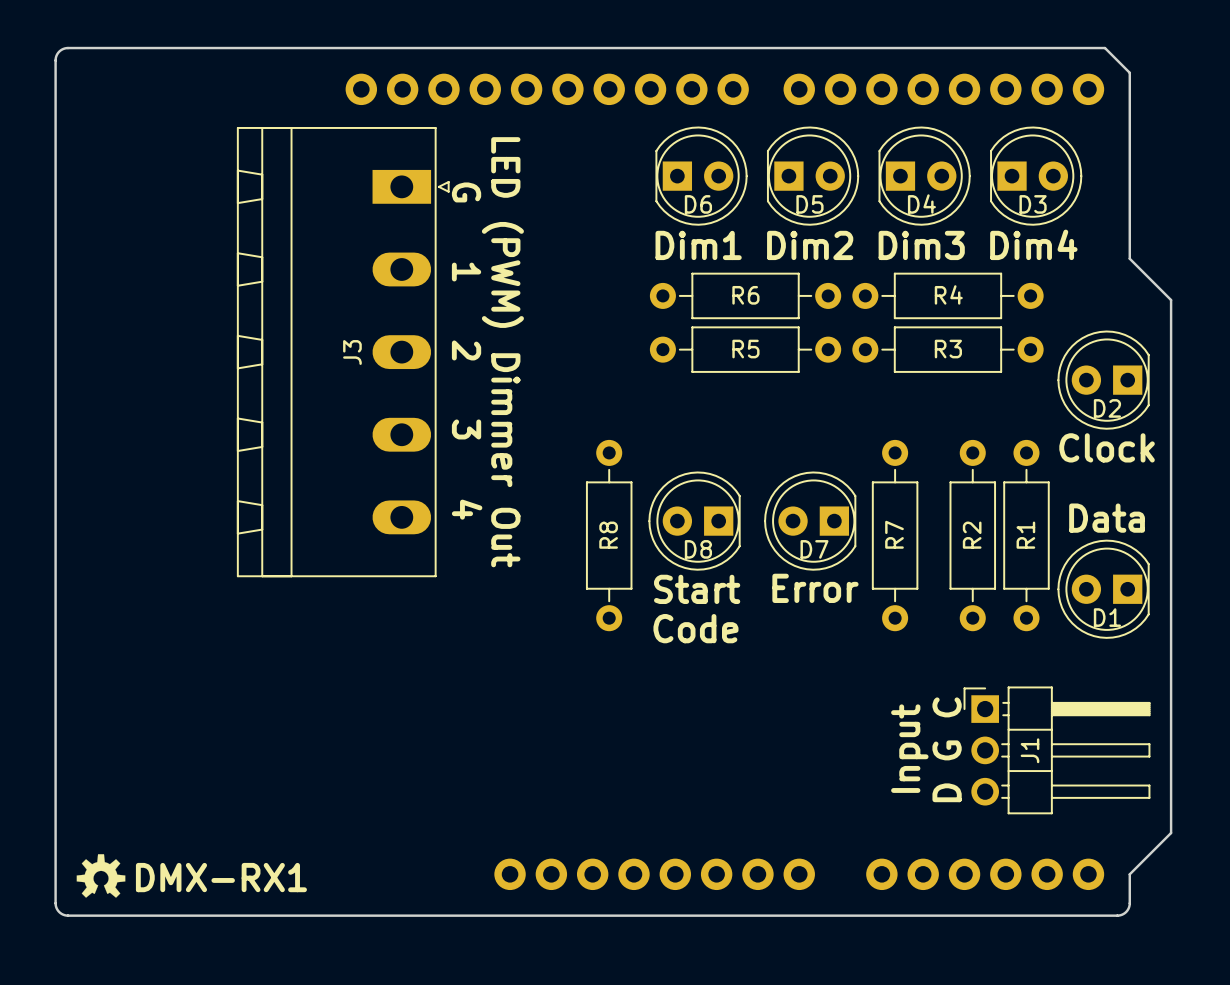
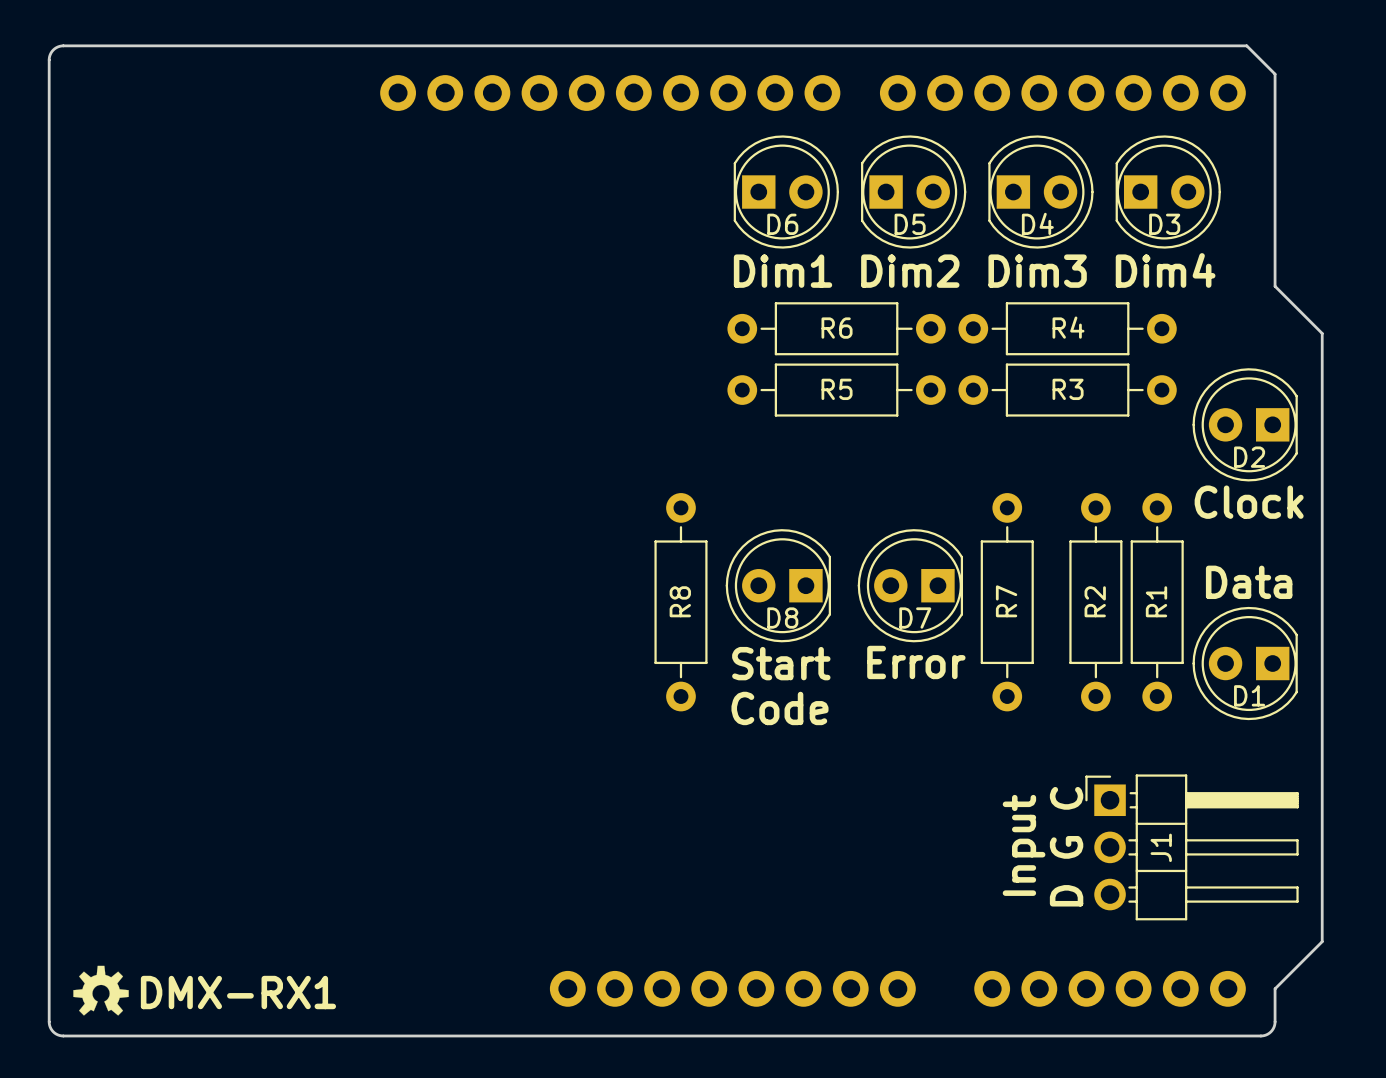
text: G 1 2 3 4 (467, 351) -> none
J3: (343, 352) -> none
text: LED (PWM) Dimmer Out (502, 352) -> none

